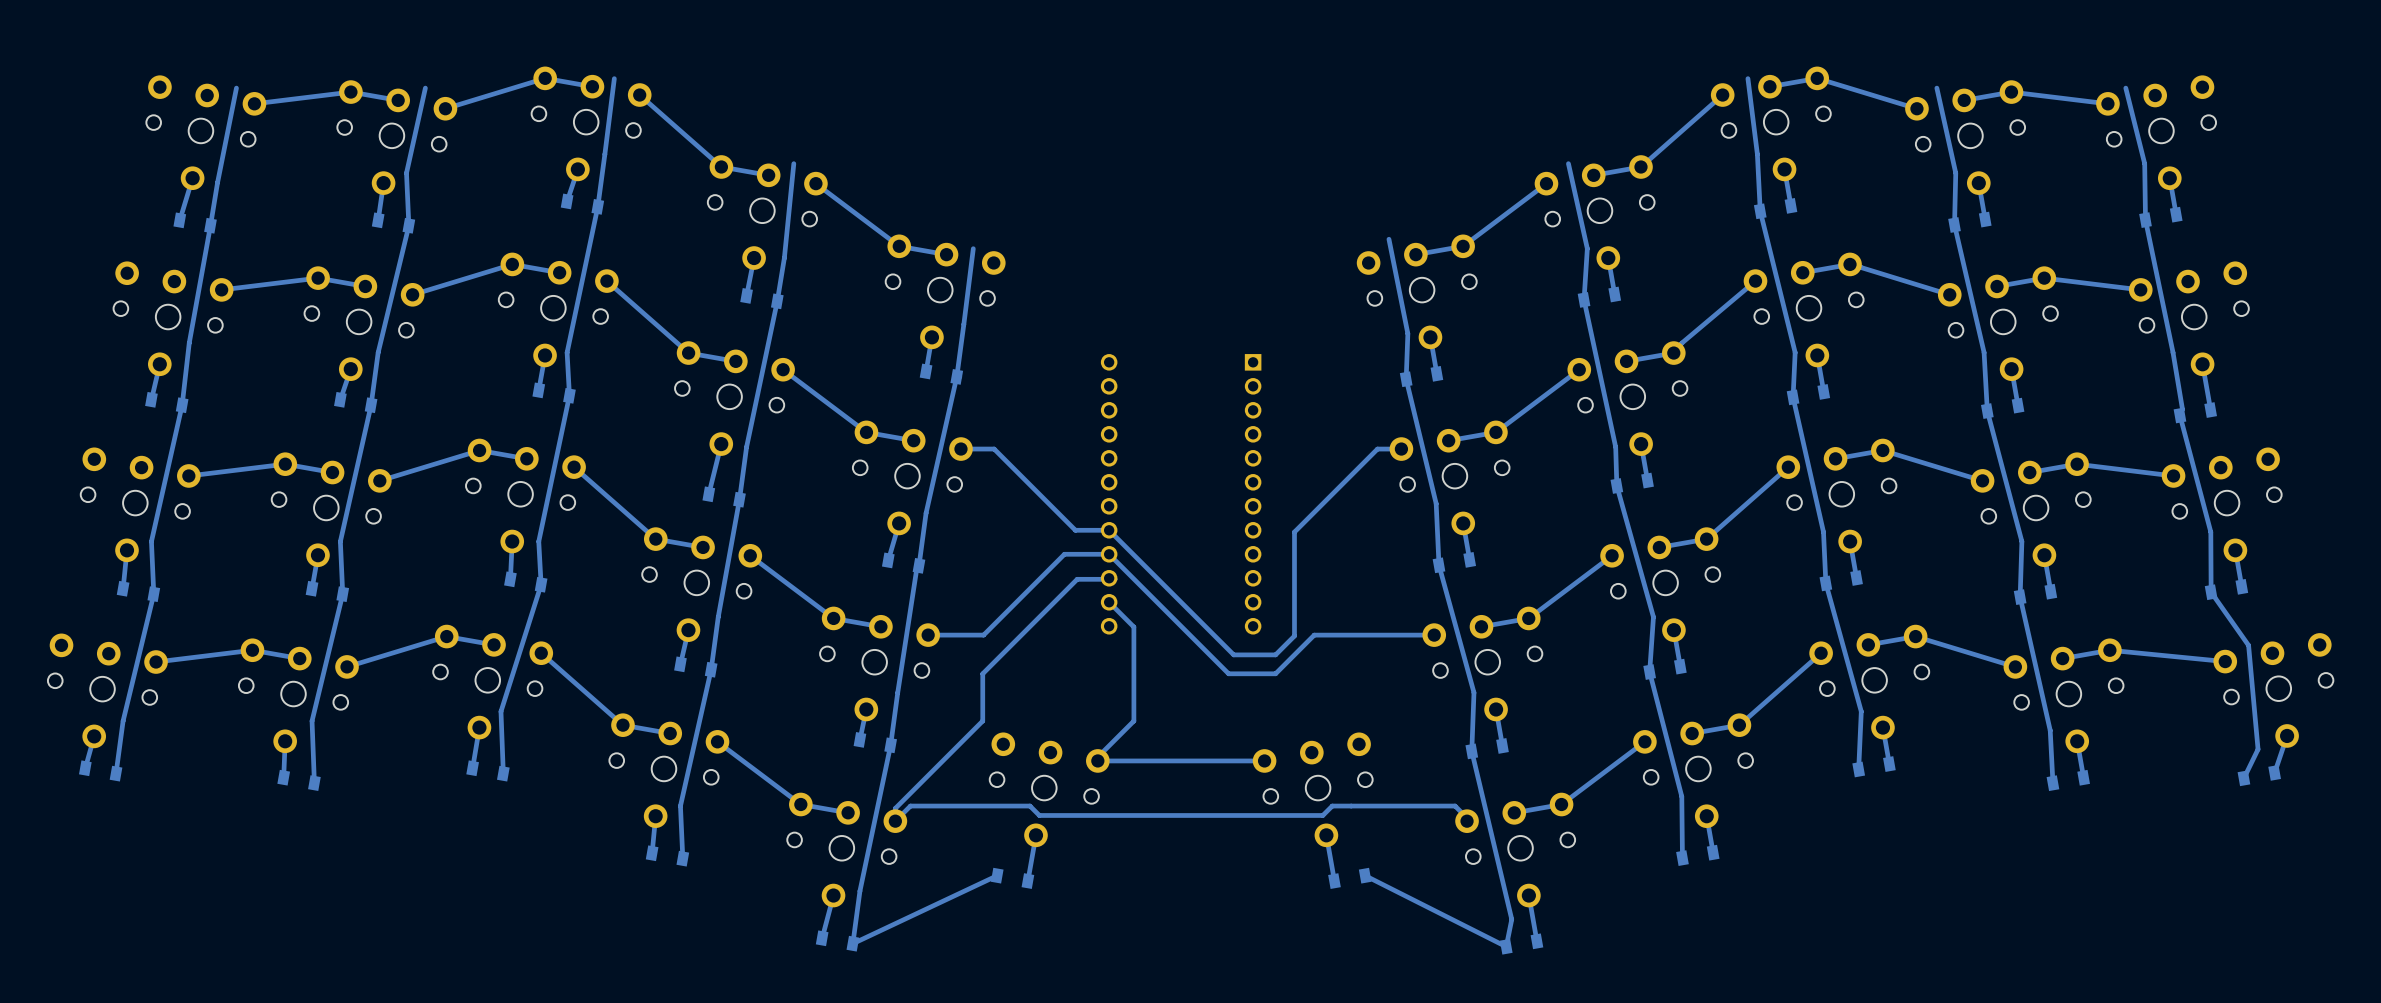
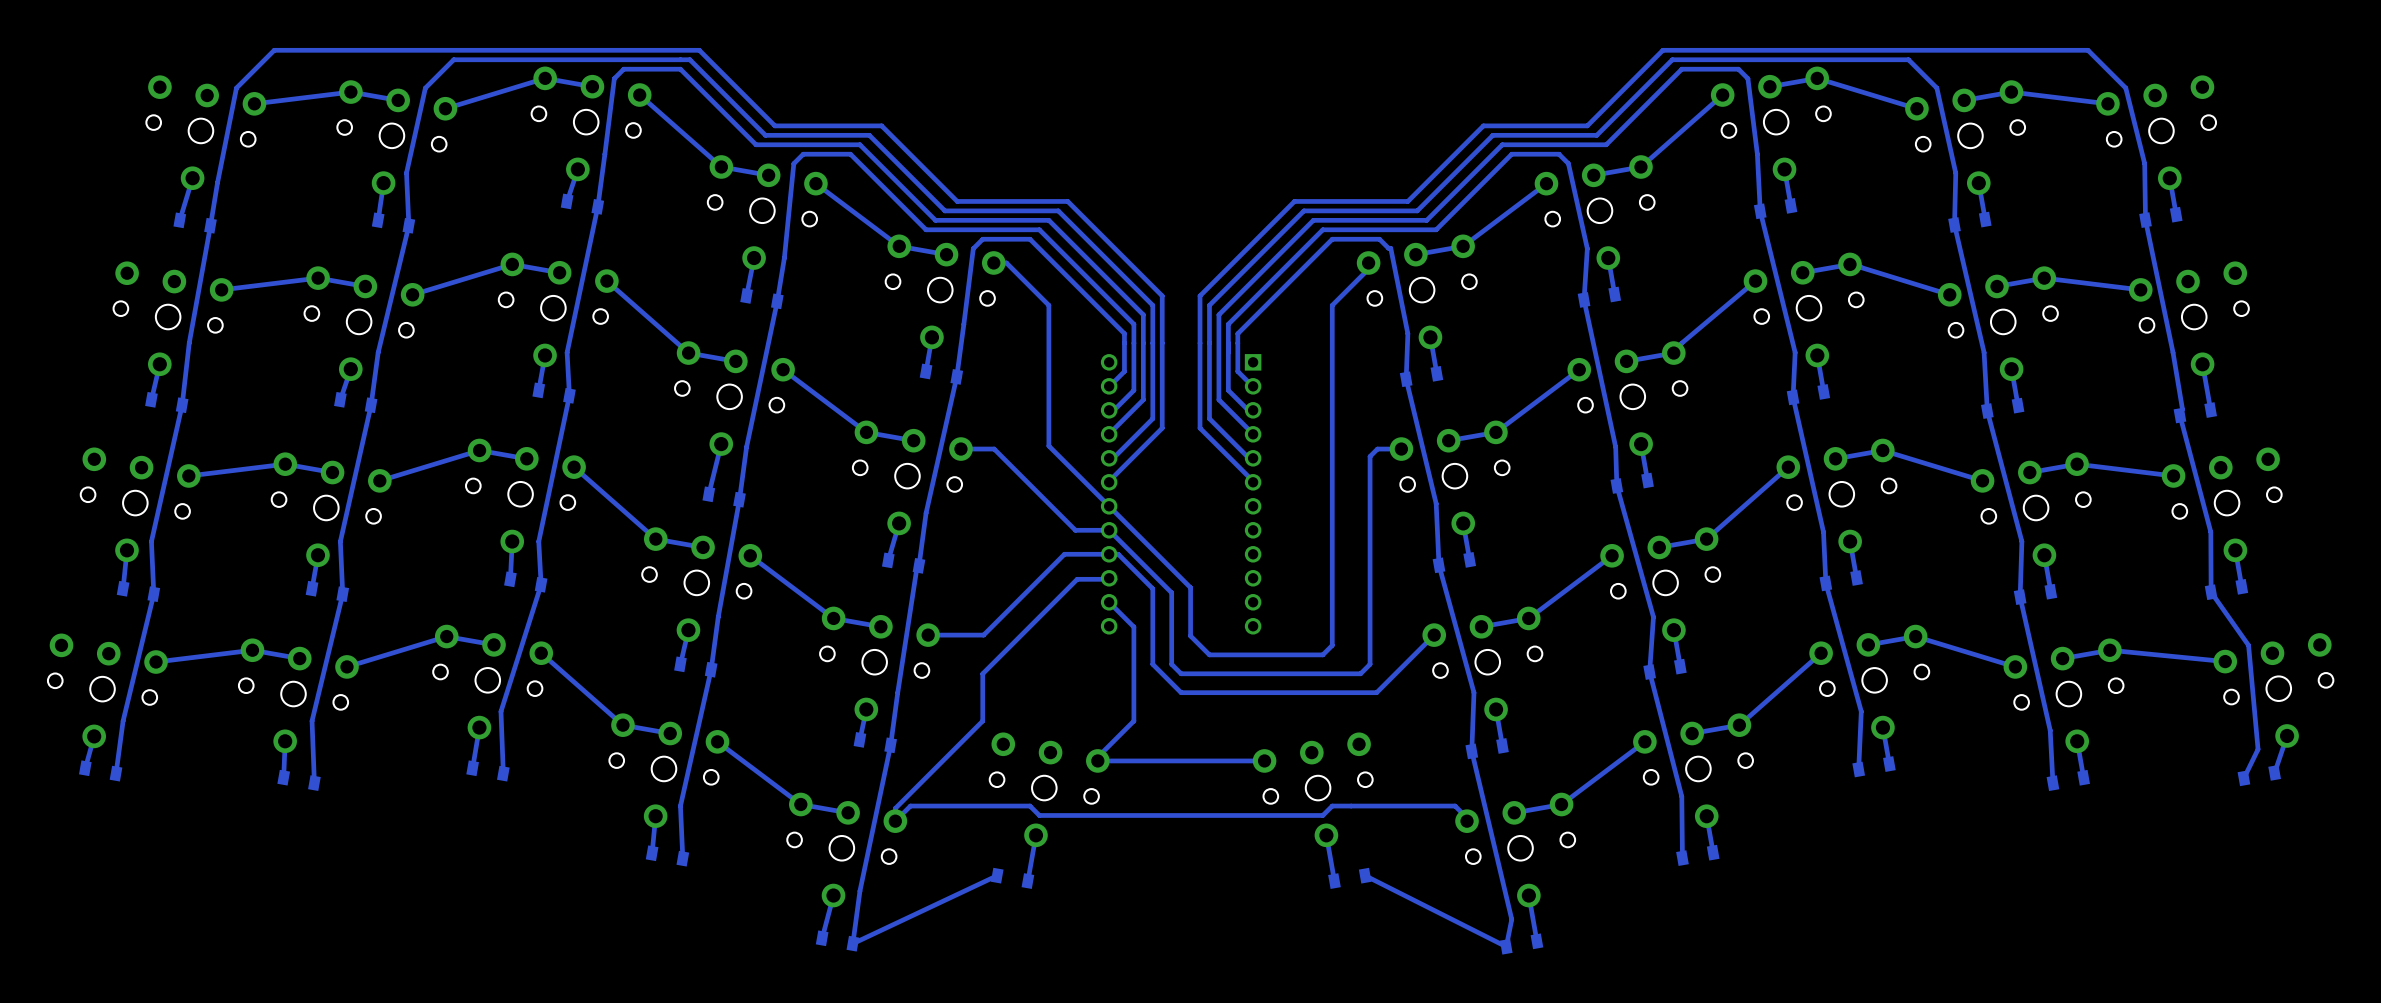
track: none -> (614, 78) (623, 69) (680, 69) (756, 144) (859, 144) (935, 220) (1048, 220) (1143, 314) (1143, 399) (1109, 434)
track: none -> (1747, 78) (1738, 69) (1681, 69) (1606, 144) (1502, 144) (1426, 220) (1313, 220) (1218, 314) (1218, 399) (1253, 434)
track: none -> (236, 88) (274, 50) (699, 50) (774, 125) (881, 125) (957, 201) (1067, 201) (1162, 295) (1162, 428) (1109, 482)
track: none -> (425, 88) (453, 59) (689, 59) (765, 135) (869, 135) (944, 210) (1058, 210) (1152, 305) (1152, 418) (1113, 458) (1109, 458)
track: none -> (1936, 88) (1908, 59) (1672, 59) (1596, 135) (1492, 135) (1417, 210) (1303, 210) (1209, 305) (1209, 418) (1249, 458) (1253, 458) (1253, 452)
track: none -> (2125, 88) (2088, 50) (1662, 50) (1587, 125) (1483, 125) (1407, 201) (1294, 201) (1200, 295) (1200, 428) (1253, 482)
track: none -> (793, 163) (803, 154) (850, 154) (926, 229) (1039, 229) (1133, 324) (1133, 390) (1113, 410) (1109, 410)
track: none -> (1568, 163) (1559, 154) (1511, 154) (1436, 229) (1322, 229) (1228, 324) (1228, 390) (1248, 410) (1253, 410)
track: (1388, 239) (1390, 248) -> (1253, 386) (1237, 371) (1237, 333) (1332, 239) (1379, 239) (1390, 248)
track: none -> (973, 248) (982, 239) (1029, 239) (1124, 333) (1124, 371) (1109, 386)
track: none -> (993, 262) (1006, 262) (1048, 305) (1048, 446) (1190, 587) (1190, 635) (1209, 654) (1233, 654)
track: none -> (1368, 262) (1368, 269) (1332, 305) (1332, 645) (1322, 654) (1275, 654)
track: (1370, 456) (1294, 532) (1294, 635) (1275, 654) -> (1370, 456) (1370, 664) (1360, 673) (1275, 673)
track: (1109, 554) (1228, 673) -> none
track: (1171, 592) (1233, 654) -> (1171, 592) (1171, 664) (1181, 673) (1228, 673)
track: (1434, 635) (1314, 635) (1275, 673) -> (1434, 635) (1376, 692) (1181, 692) (1152, 664) (1152, 588) (1118, 554) (1109, 554)

